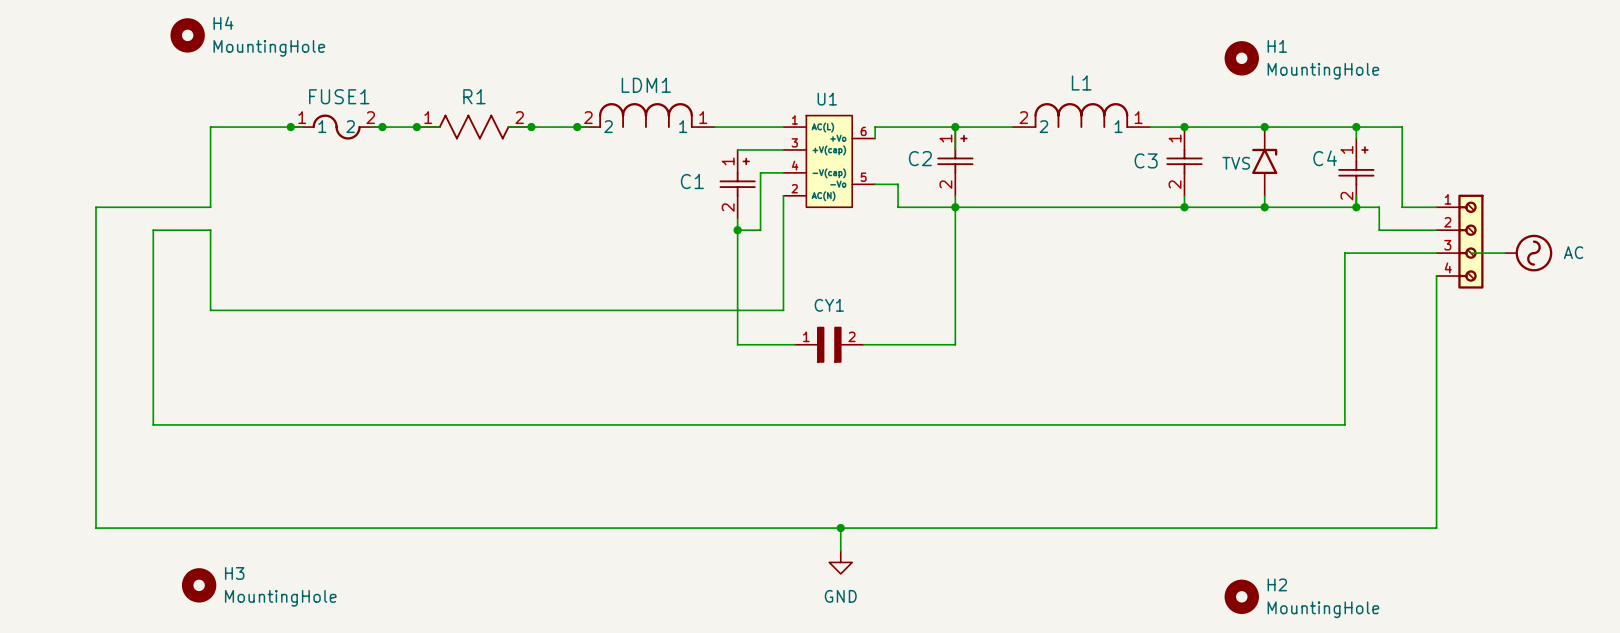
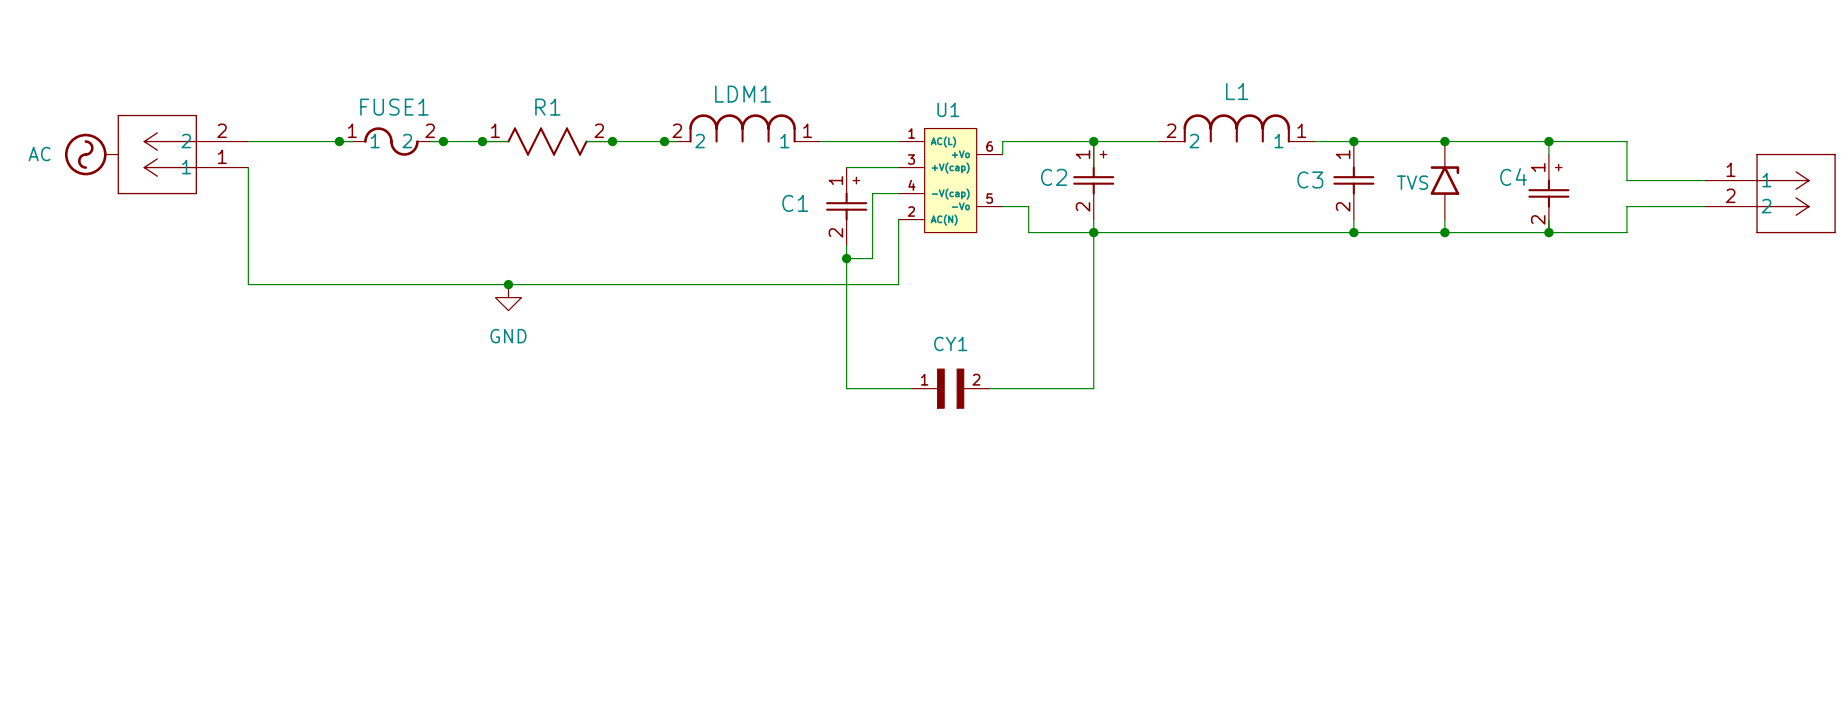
H4: MountingHole (187, 35) -> none
H1: MountingHole (1241, 58) -> none
wire: (210, 127) (210, 149) -> none
wire: (1402, 127) (1402, 207) -> (1600, 141) (1626, 141) (1626, 180) (1705, 180)
power symbol: none -> AC (91, 154)
part: none -> (183, 154)
part: none -> (1770, 193)
wire: (210, 207) (96, 207) (96, 528) (1436, 528) (1436, 276) -> (248, 232) (248, 258)
wire: (1379, 207) (1379, 230) (1436, 230) -> (1574, 232) (1600, 232)
wire: (1425, 207) (1436, 207) -> (1626, 232) (1626, 206) (1705, 206)
wire: (210, 230) (153, 230) (153, 424) (1344, 424) (1344, 253) (1436, 253) -> none
part: (1460, 241) -> none
wire: (210, 253) (210, 310) (783, 310) (783, 253) -> (248, 284) (898, 284)
junction: none -> (508, 284)
wire: (1470, 253) (1505, 253) -> none
power symbol: AC (1528, 253) -> none
power symbol: none -> GND (508, 297)
wire: (840, 528) (840, 550) -> none
junction: (840, 528) -> none
power symbol: GND (840, 562) -> none
H3: MountingHole (199, 585) -> none
H2: MountingHole (1241, 596) -> none

